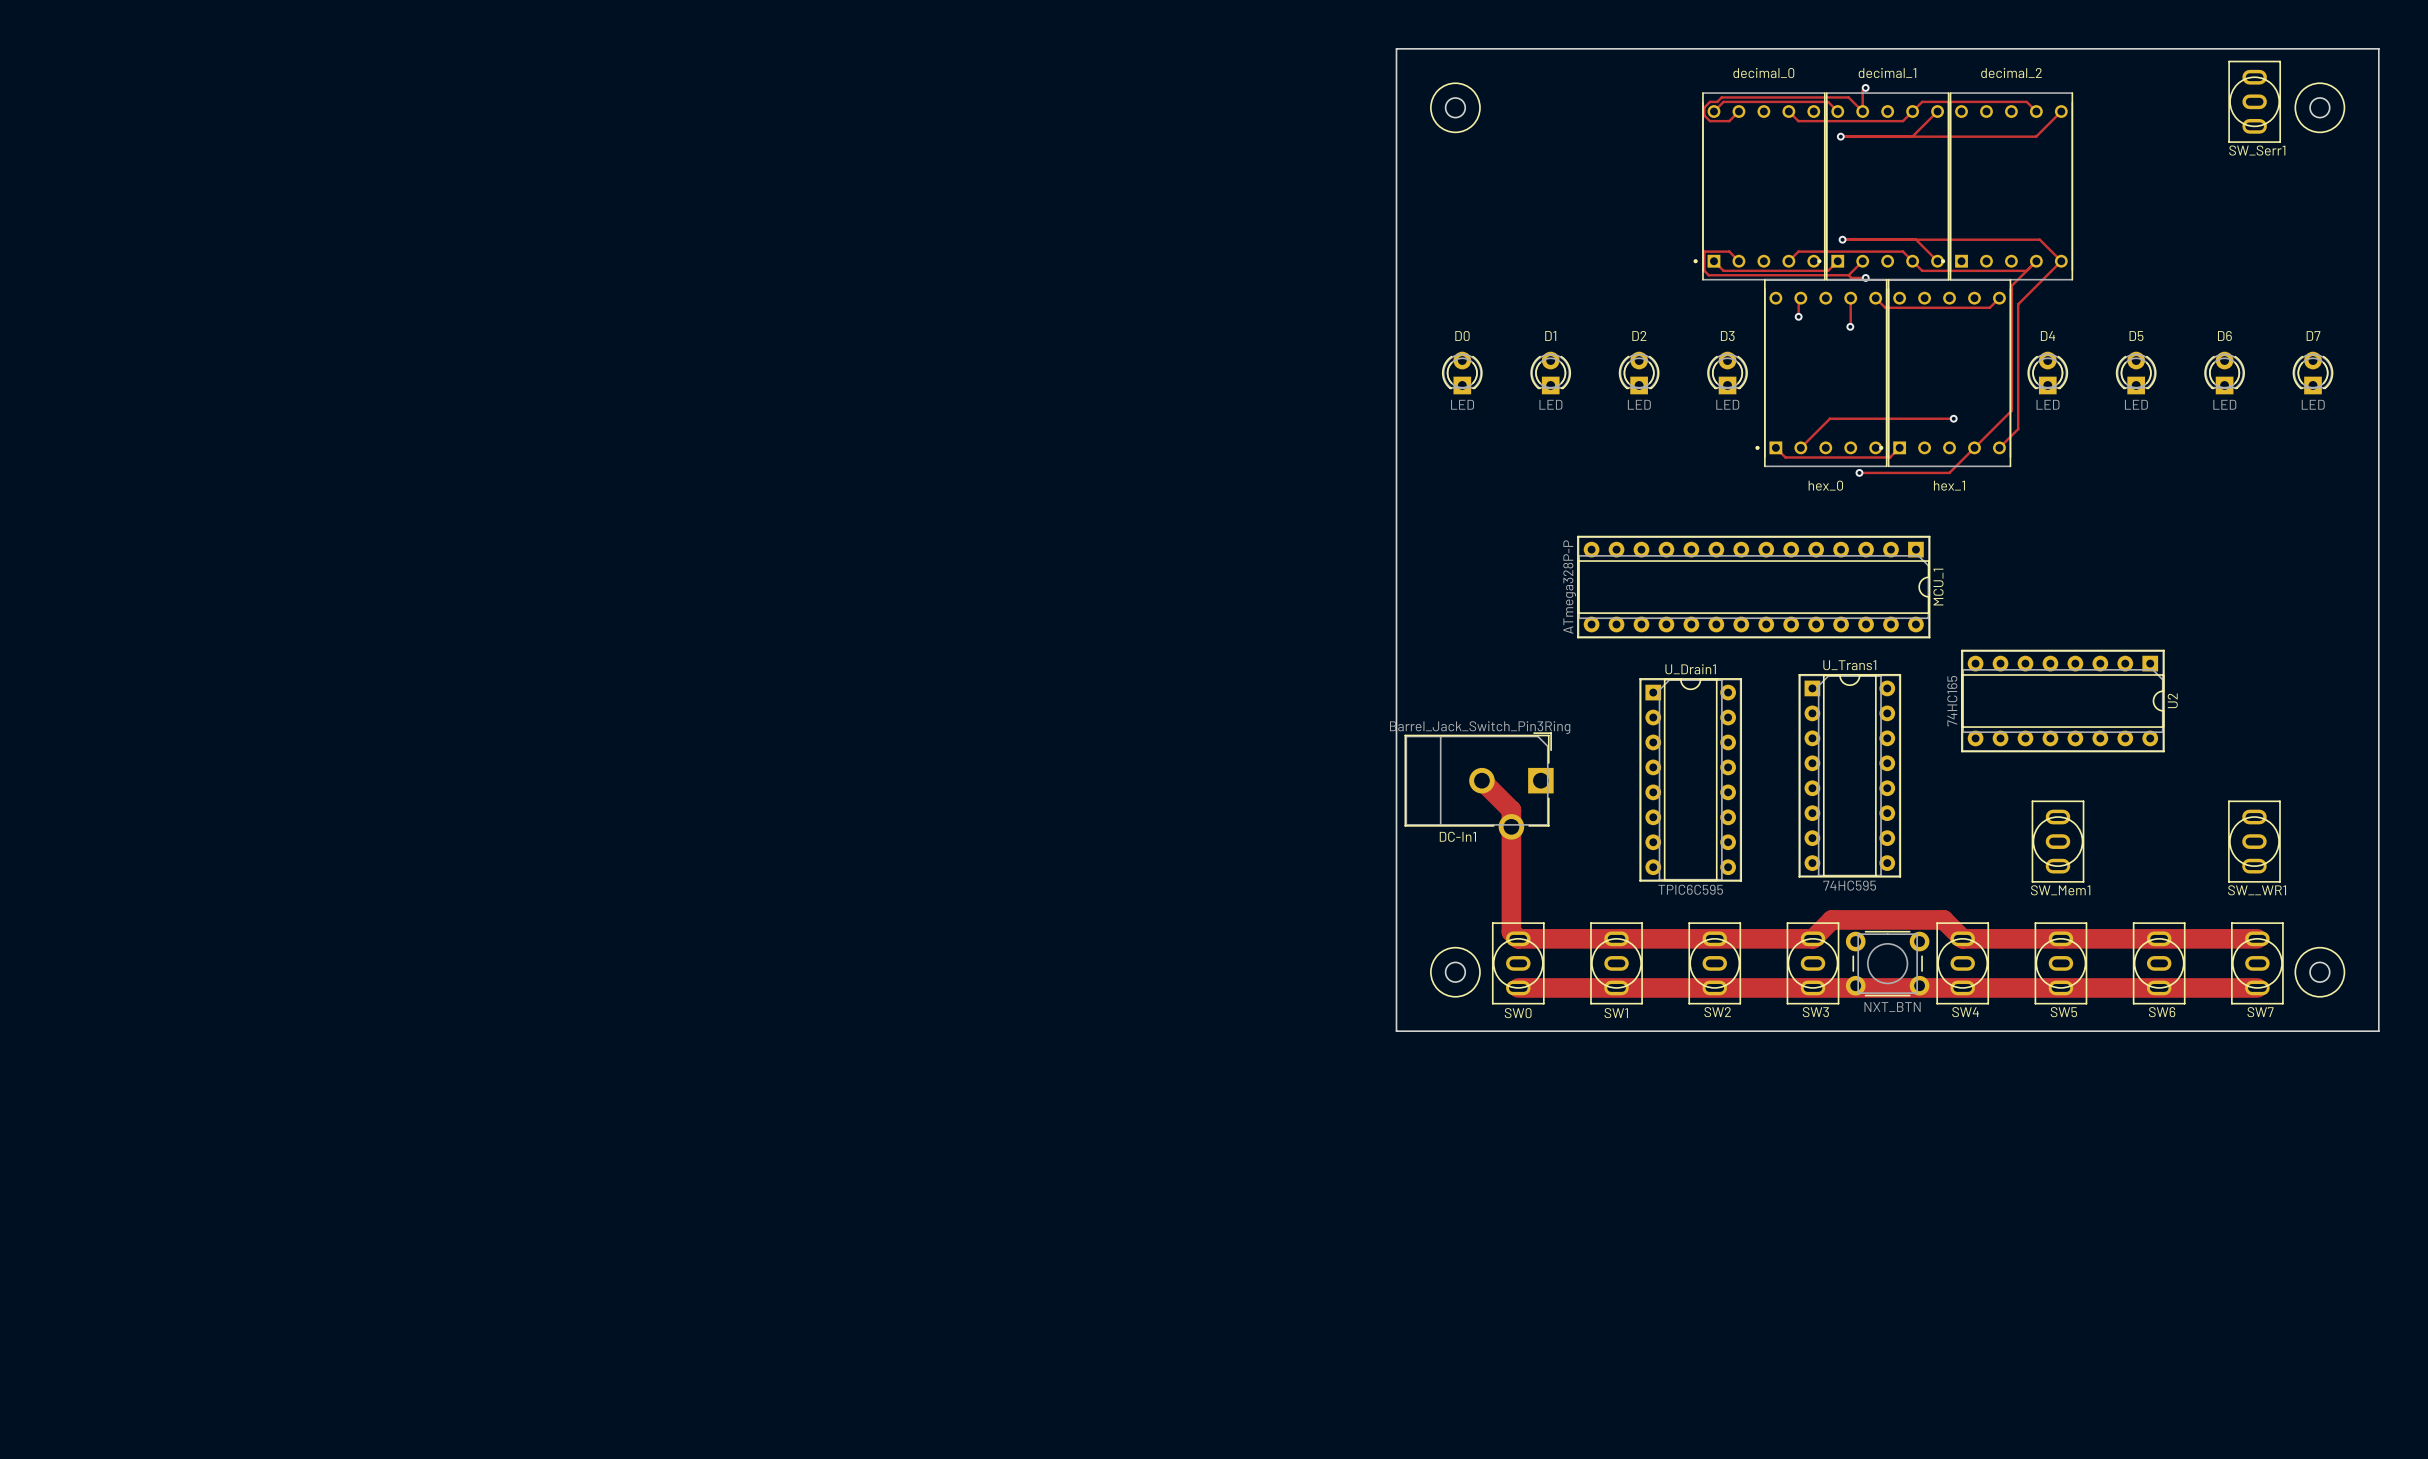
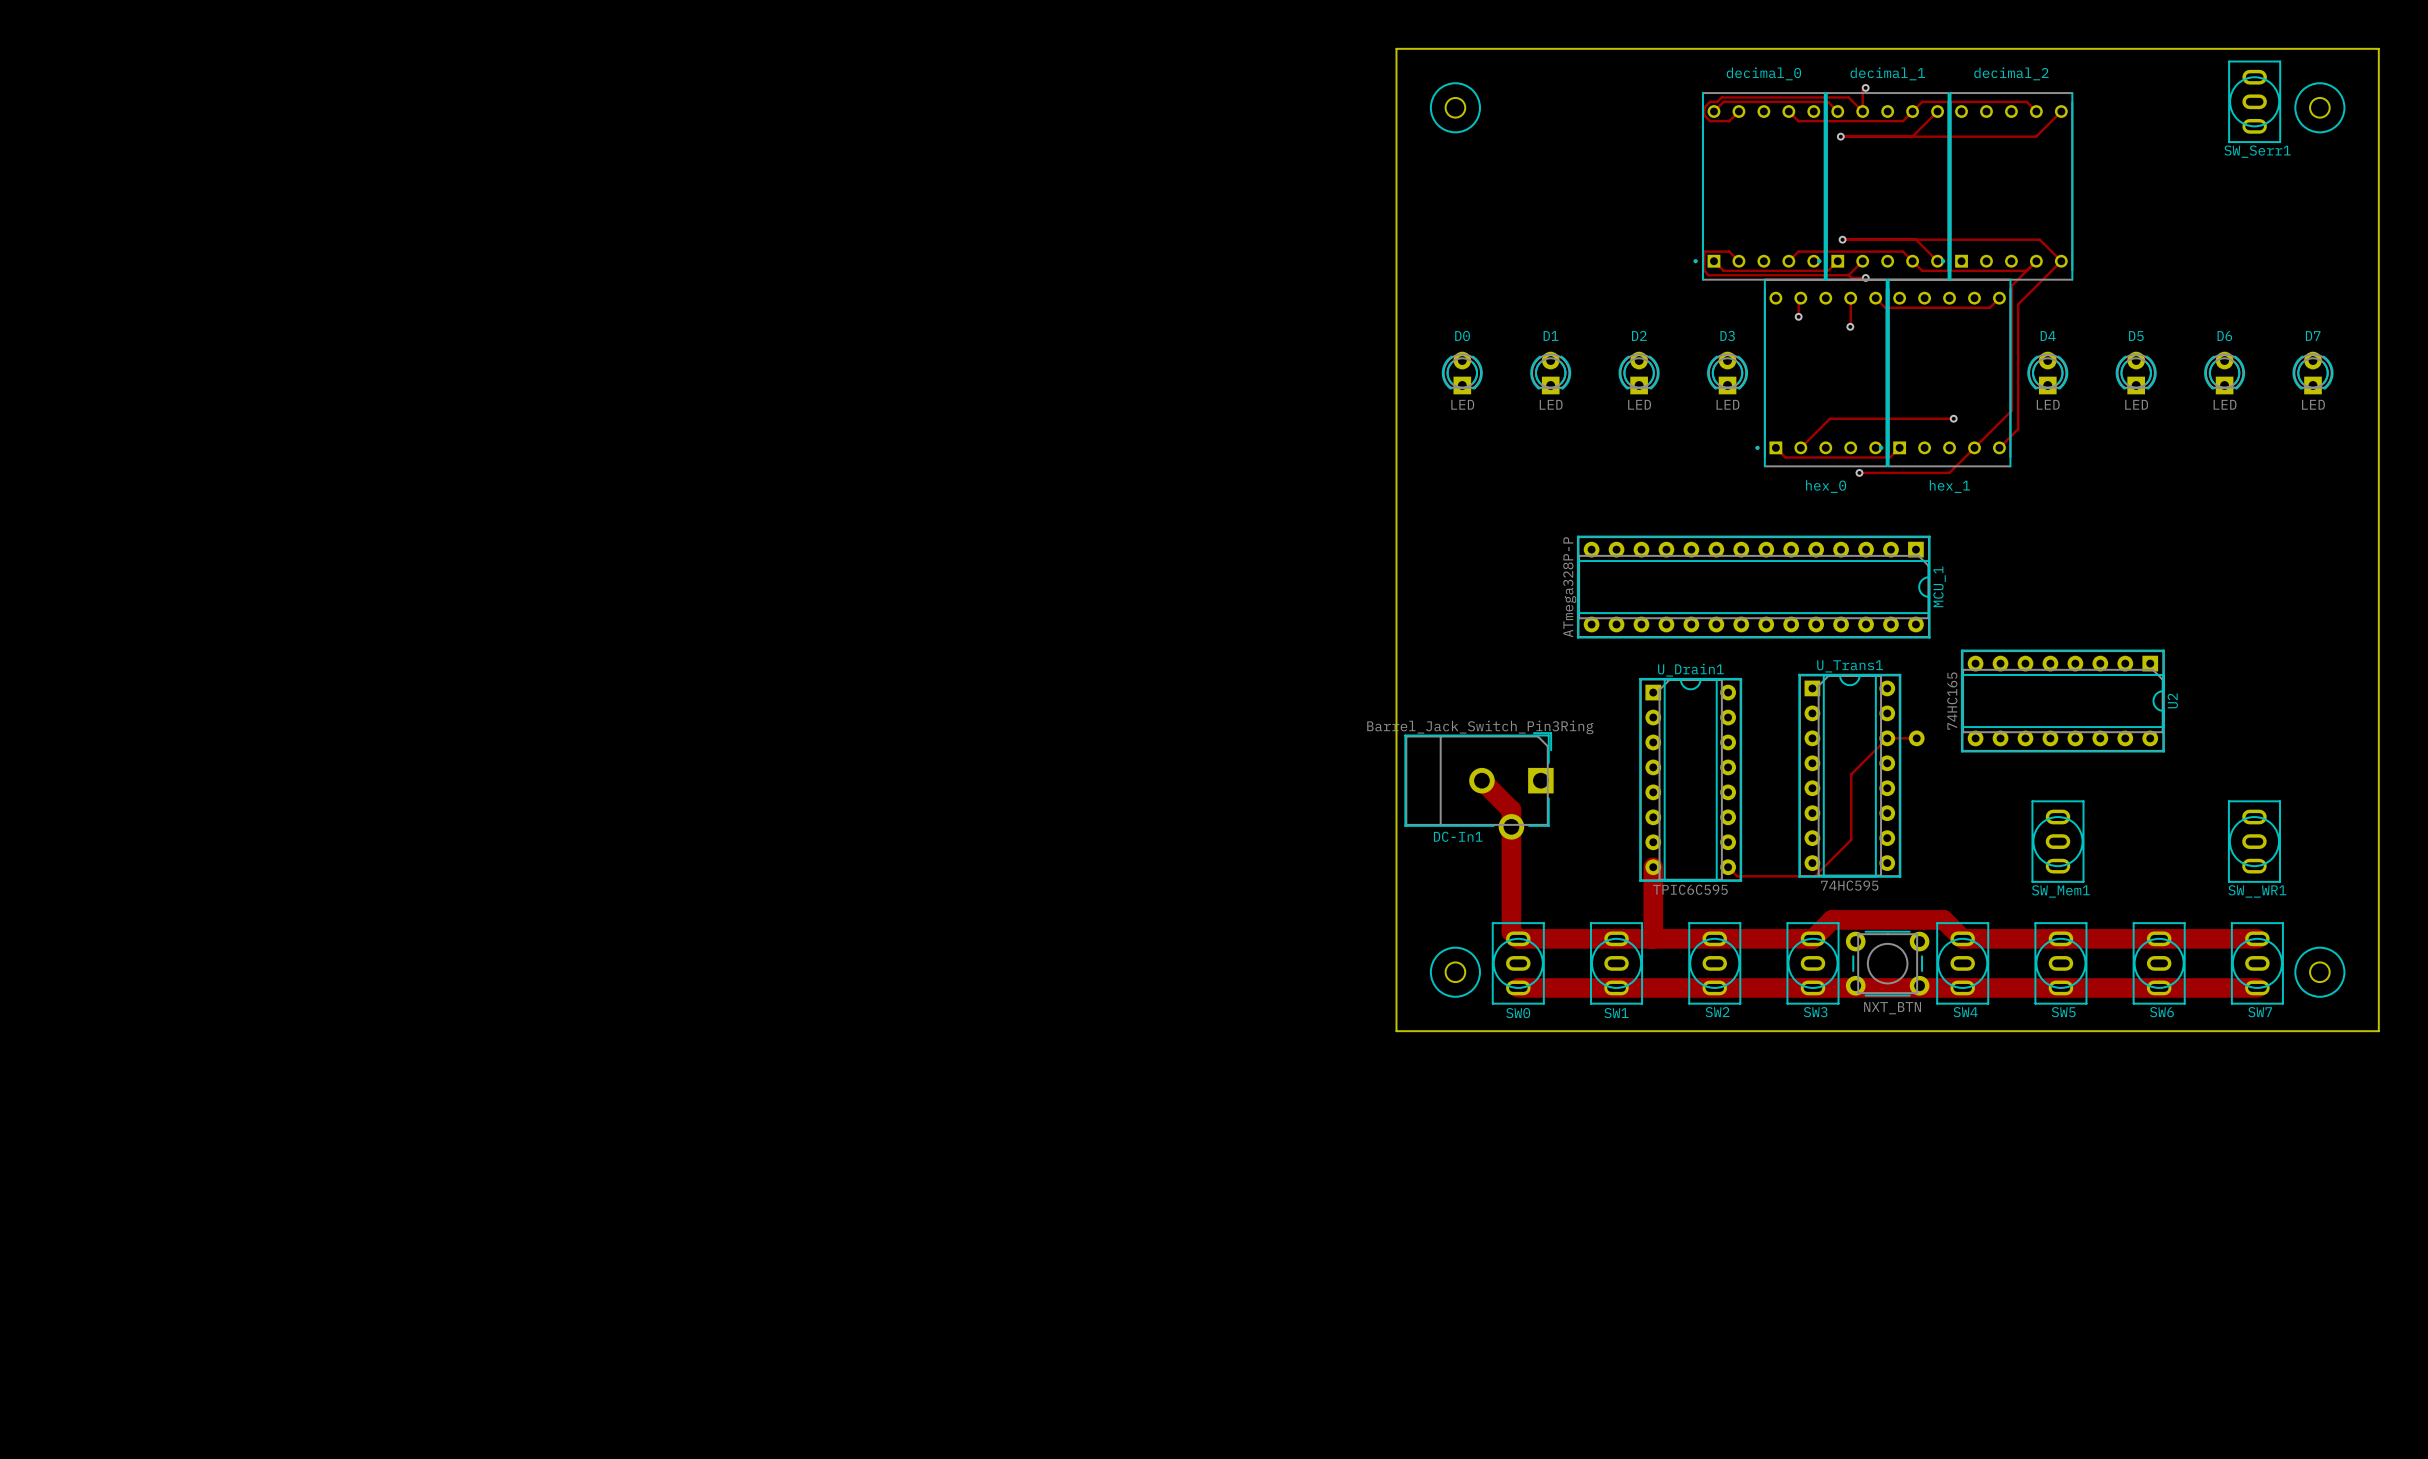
track: none -> (1916, 738) (1887, 738) (1851, 774) (1851, 839) (1814, 876) (1737, 876) (1728, 867)
part: none -> (1916, 738)
track: none -> (1653, 867) (1652, 938)

